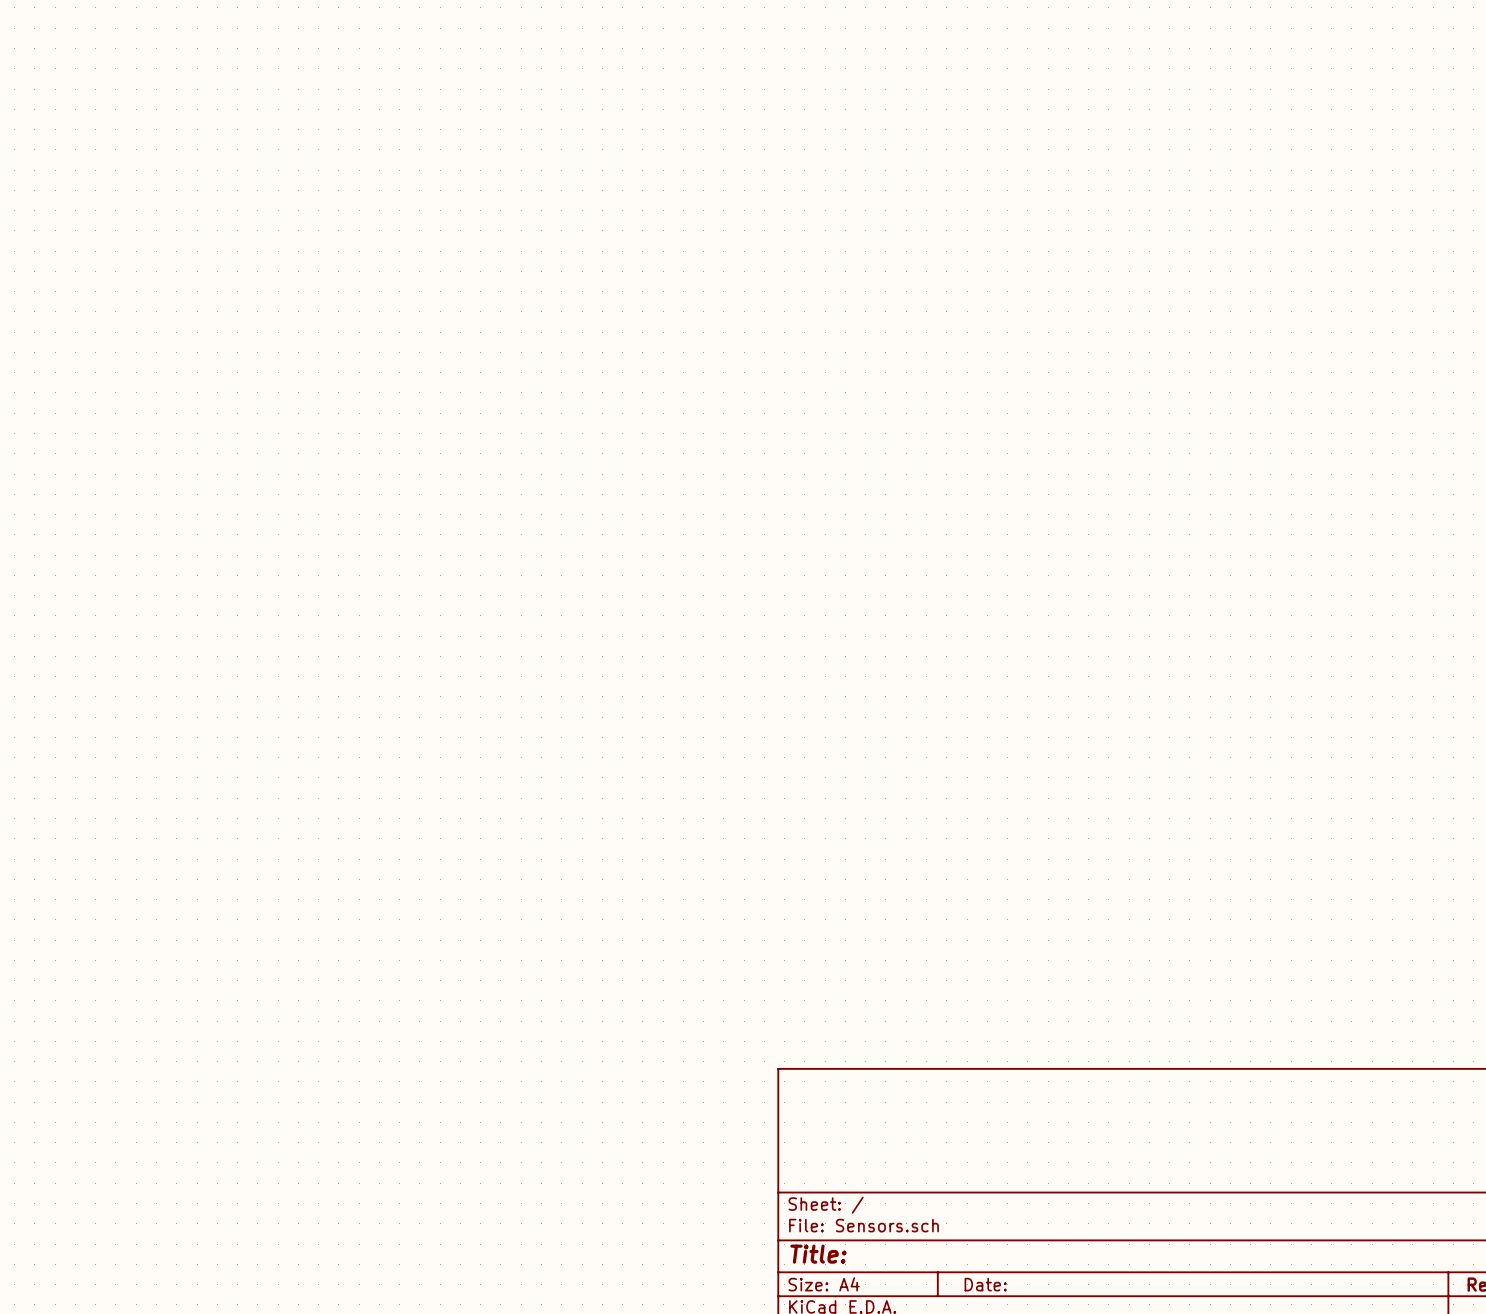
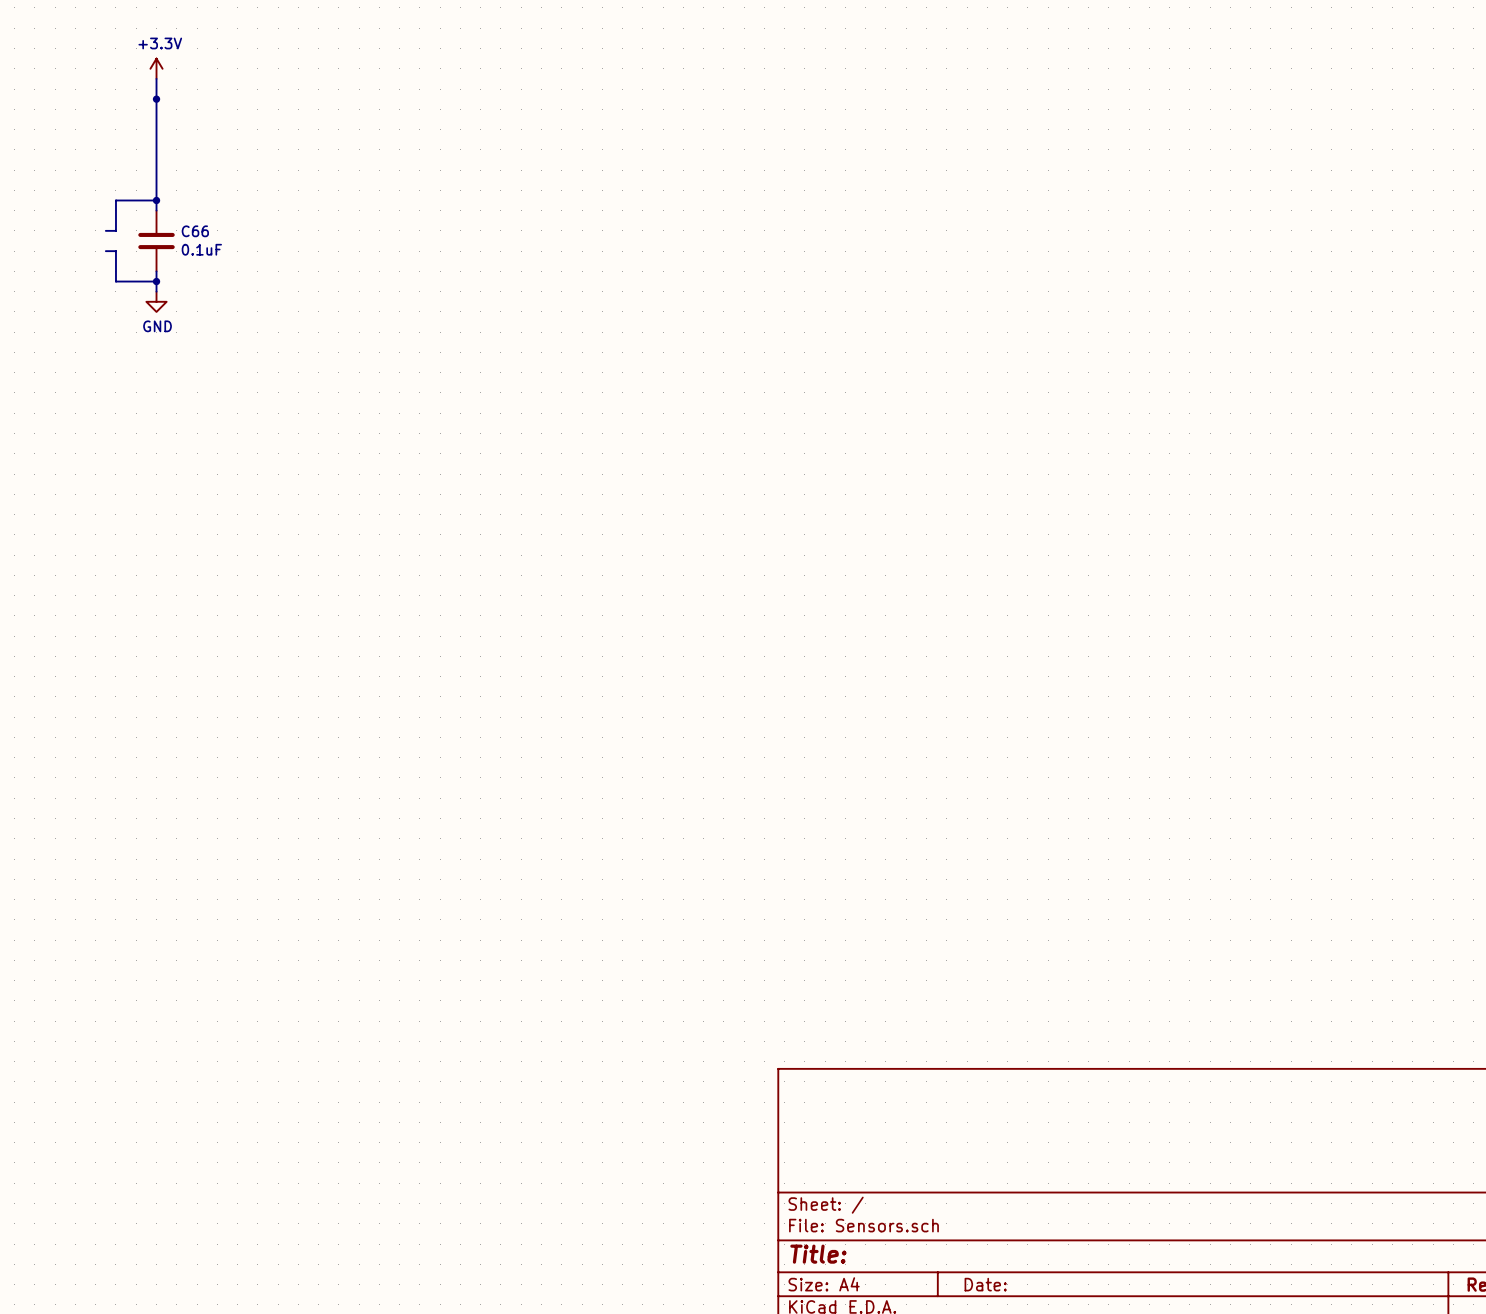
power symbol: none -> +3.3V (156, 68)
wire: none -> (156, 78) (156, 210)
junction: none -> (156, 99)
wire: none -> (156, 200) (115, 200) (115, 230) (105, 230)
junction: none -> (156, 200)
C66: none -> 0.1uF (156, 241)
wire: none -> (105, 251) (115, 251) (115, 281) (156, 281)
wire: none -> (156, 271) (156, 291)
junction: none -> (156, 281)
power symbol: none -> GND (156, 301)

